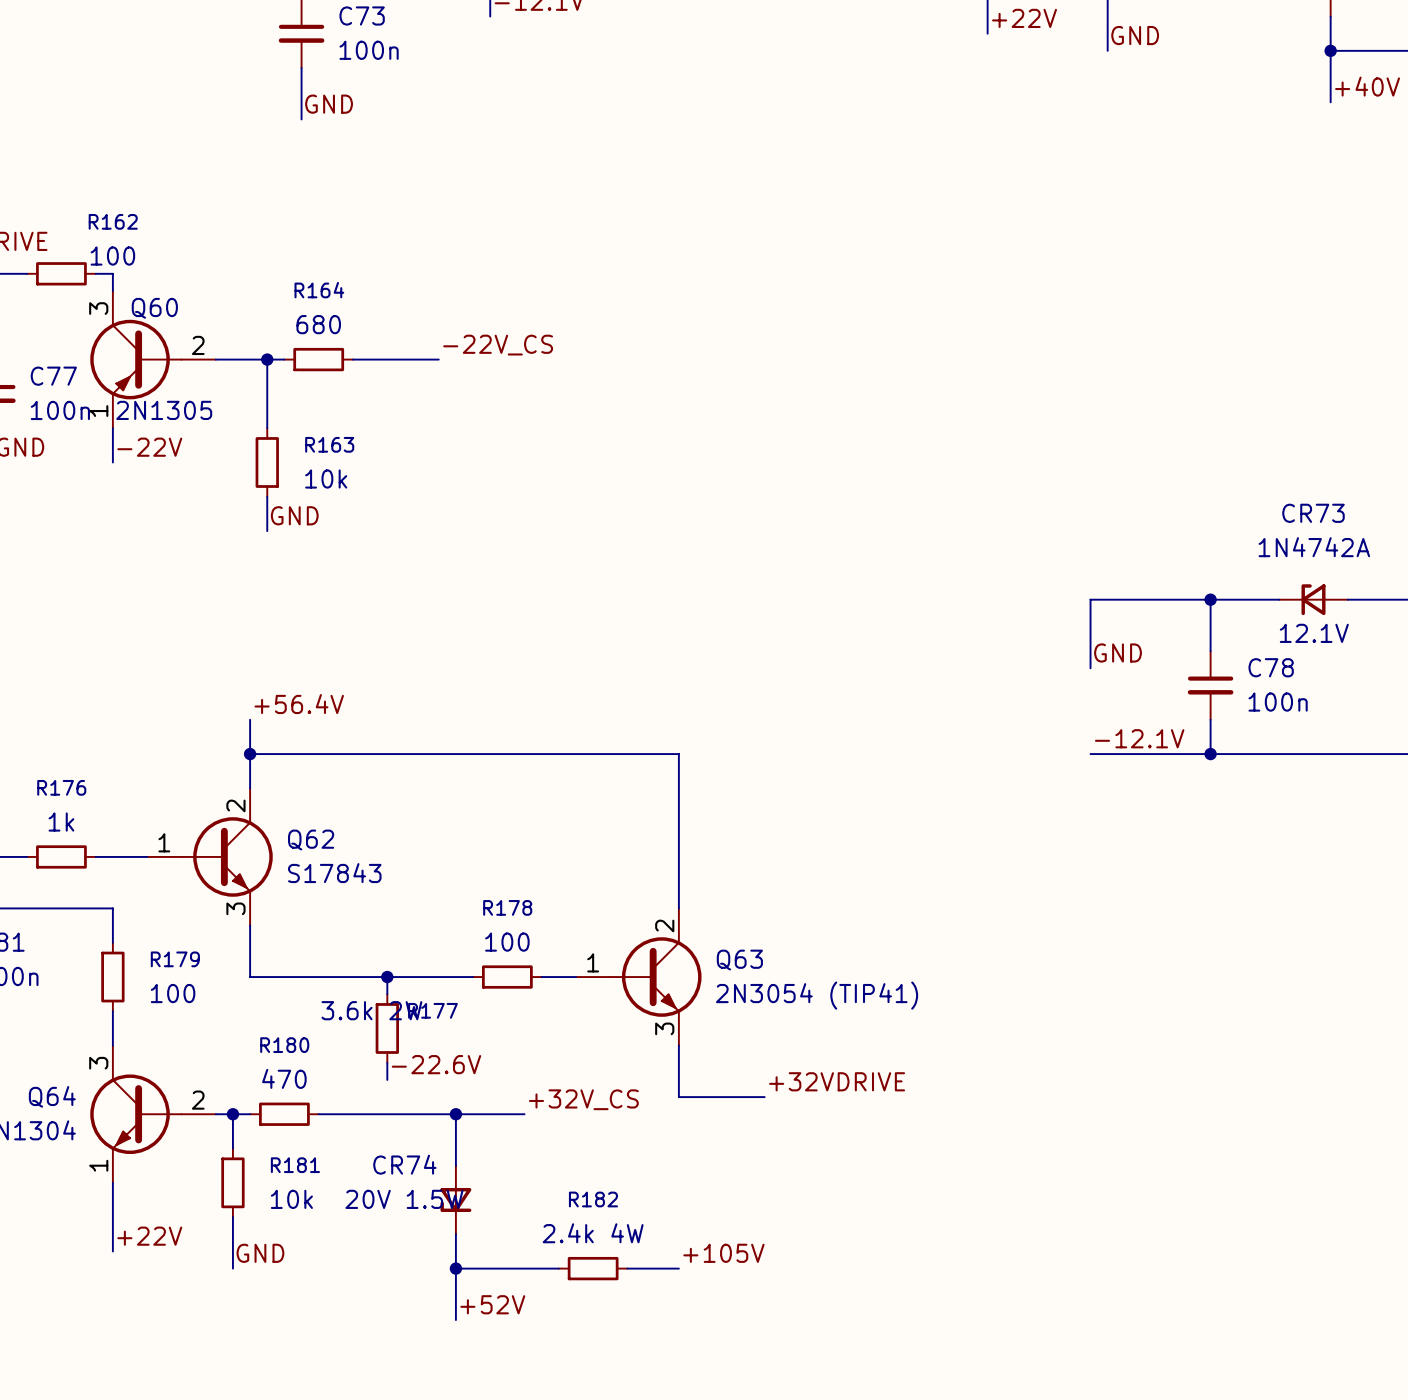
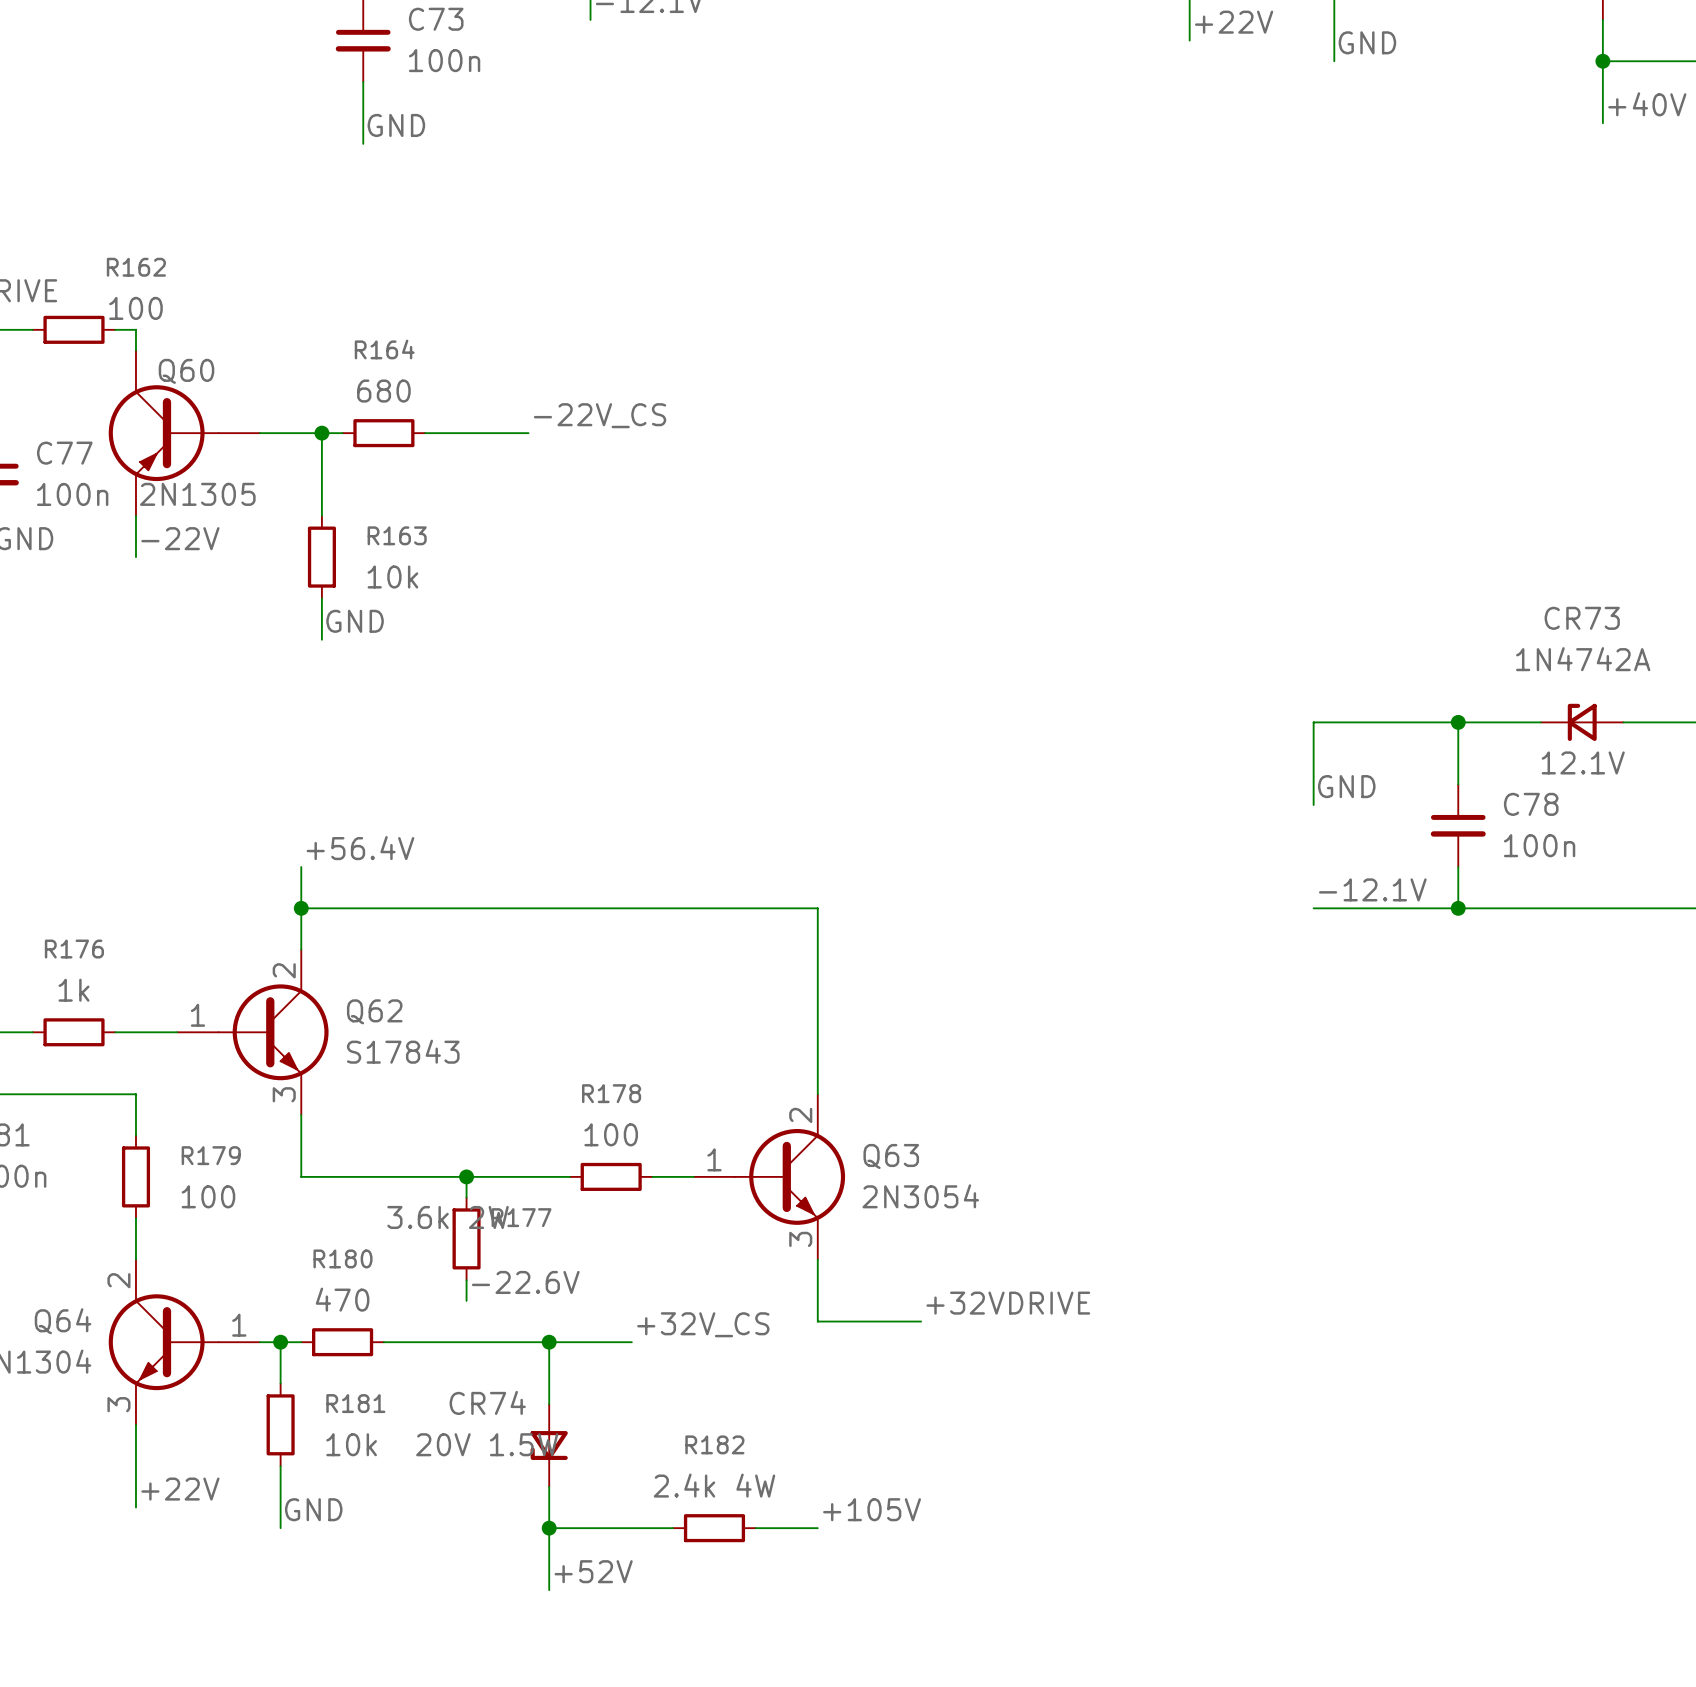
Q60 pin number: 3 (98, 308) -> none
Q60 pin number: 2 (198, 345) -> none
Q60 pin number: 1 (98, 411) -> none
Q63 value: 2N3054 (TIP41) (817, 995) -> 2N3054 (920, 1196)
Q64 pin number: 3 (98, 1063) -> 2 (118, 1280)
Q64 pin number: 2 (198, 1100) -> 1 (239, 1325)
Q64 pin number: 1 (98, 1165) -> 3 (118, 1404)

